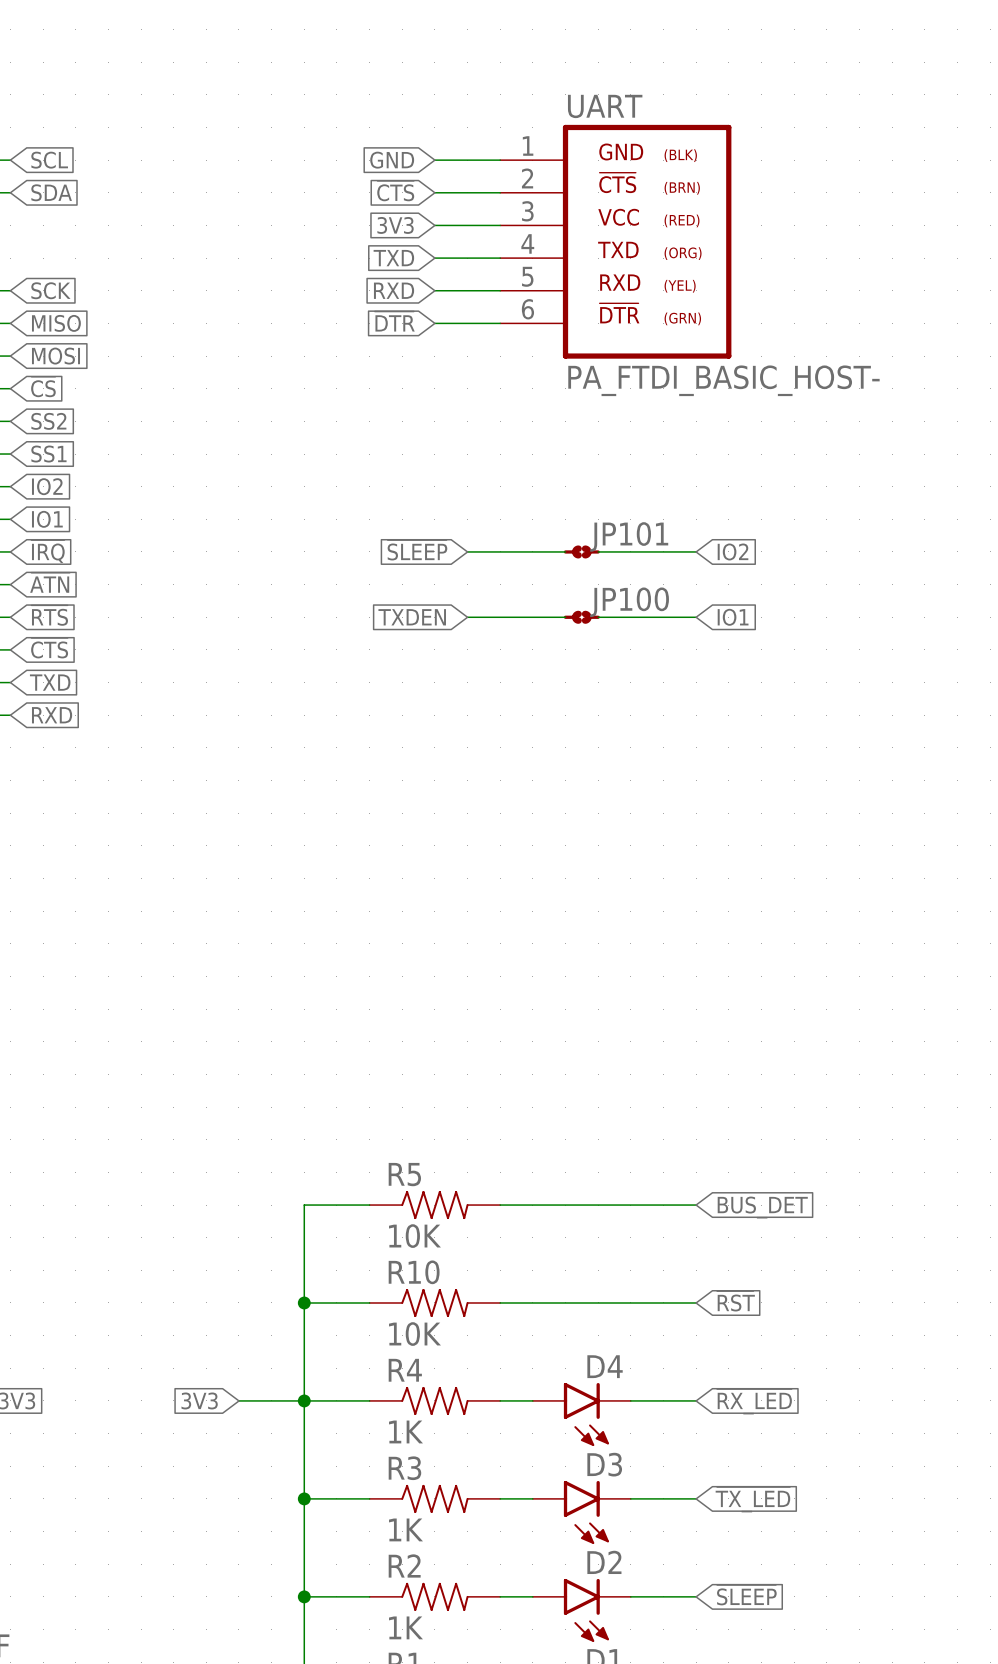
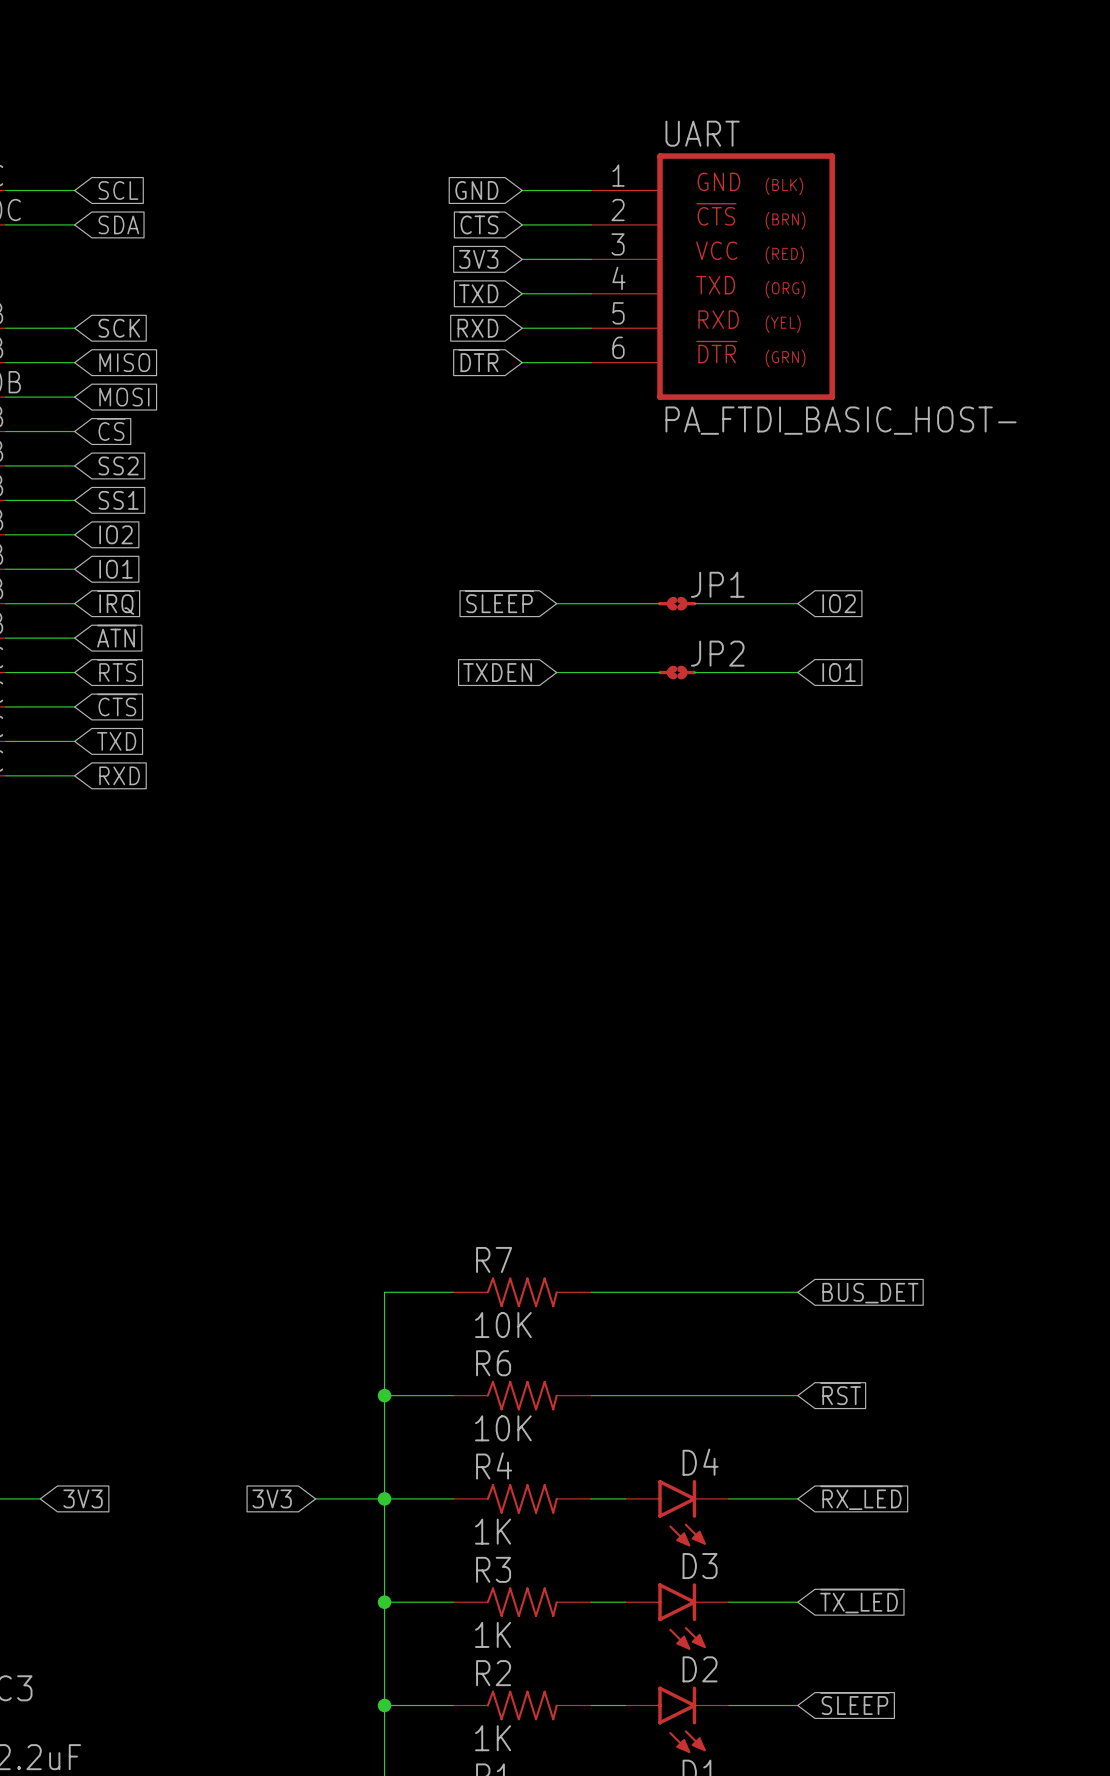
JP101 name: JP101 (629, 536) -> JP1 (717, 584)
JP100 name: JP100 (629, 602) -> JP2 (717, 653)
R5 name: R5 (404, 1174) -> R7 (494, 1259)
R10 name: R10 (414, 1272) -> R6 (493, 1363)

